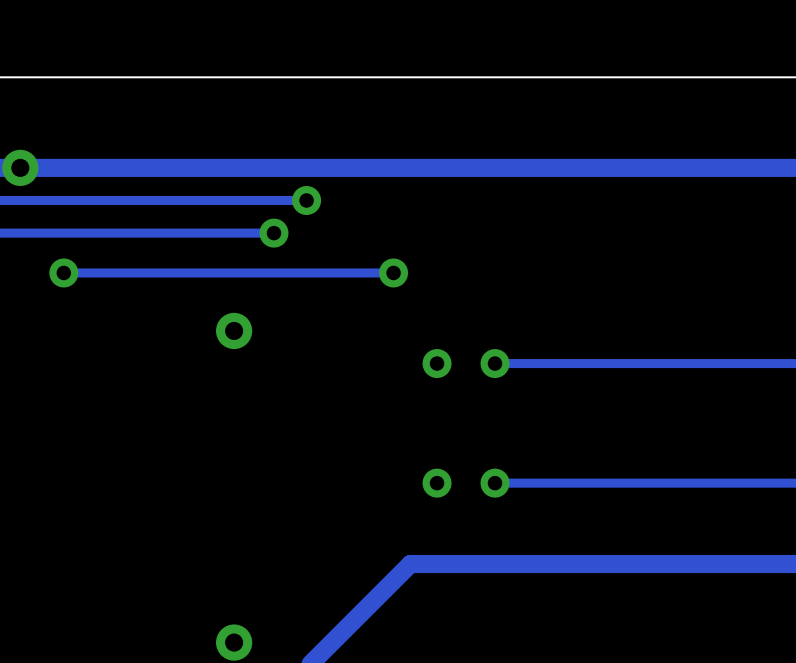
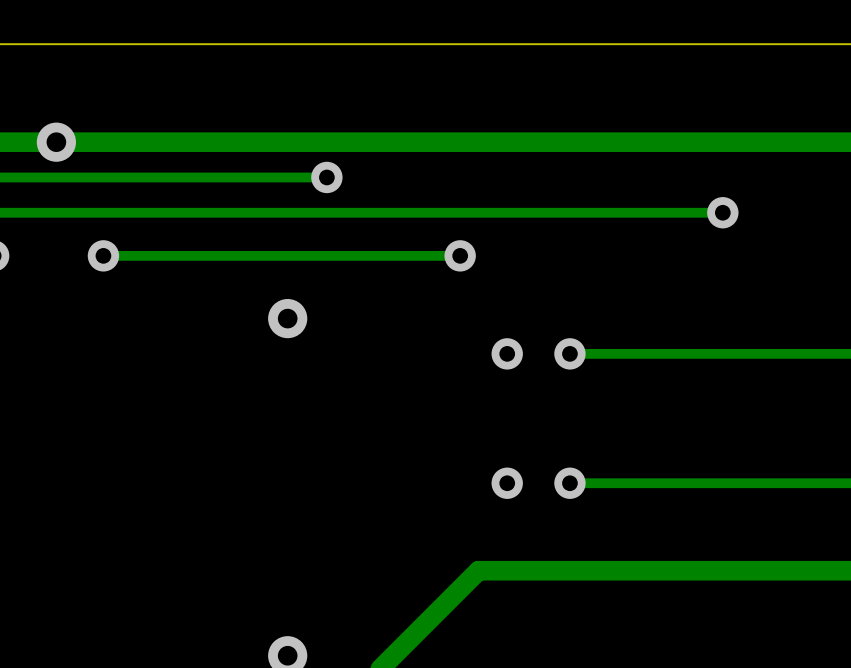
via: none -> (326, 177)
track: (306, 200) (270, 200) -> none
via: (306, 200) -> none
via: (273, 233) -> none
track: none -> (722, 212) (330, 212)
via: none -> (722, 212)

